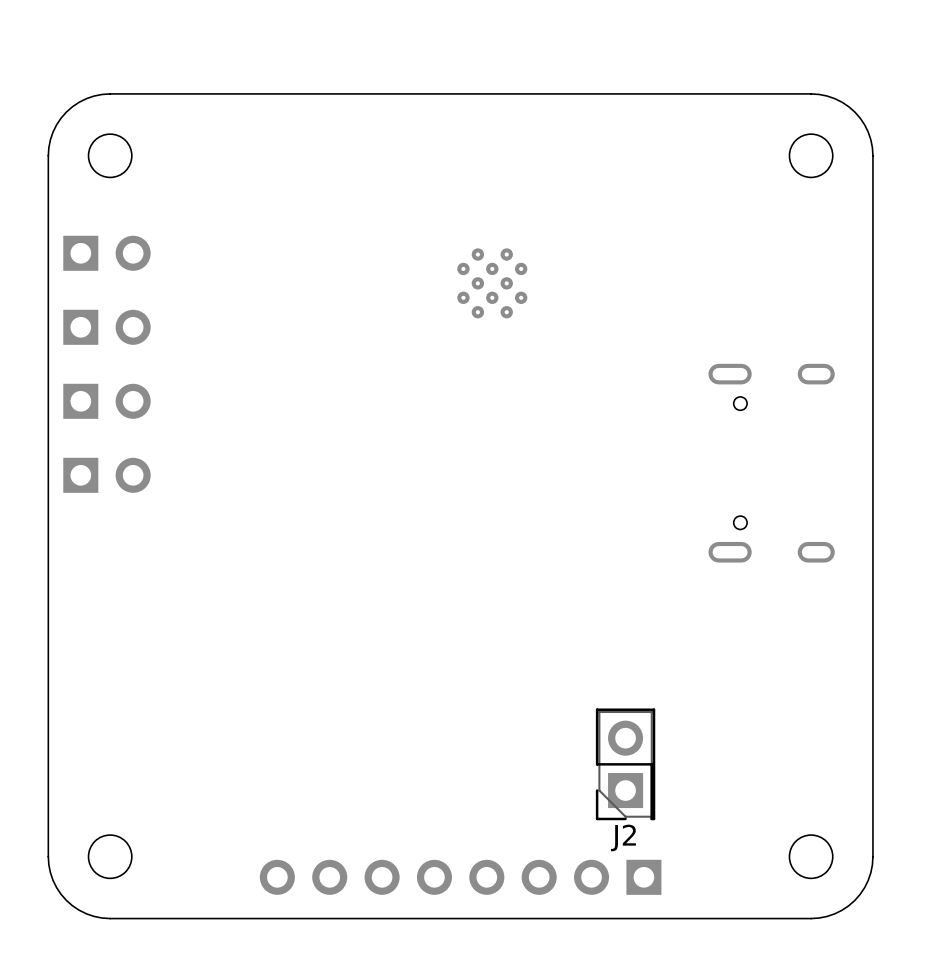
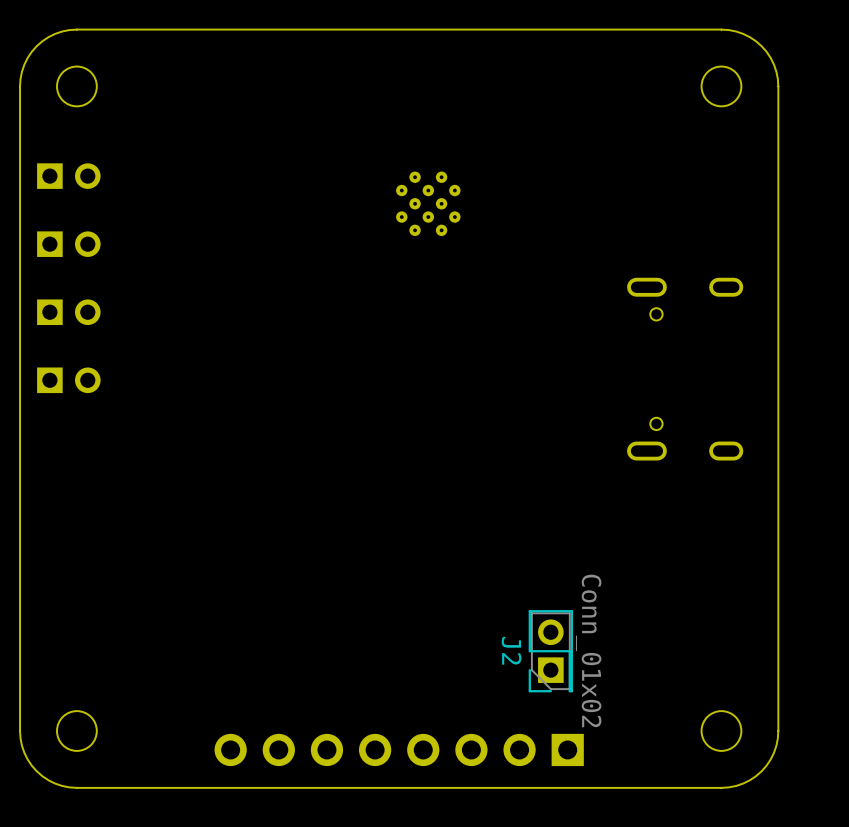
part footprint: [63, 235, 151, 271] -> [37, 163, 101, 189]
part footprint: [63, 309, 151, 345] -> [37, 231, 101, 257]
part footprint: [63, 383, 151, 419] -> [37, 299, 101, 326]
part footprint: [63, 457, 151, 493] -> [37, 367, 101, 394]
J2 footprint: [595, 708, 656, 821] -> [528, 610, 574, 693]
J2 value: none -> Conn_01x02 (588, 650)
J2 name rotation: 0° (623, 837) -> 90° clockwise (511, 650)
J2 name position: J2 (623, 837) -> J2 (511, 650)

